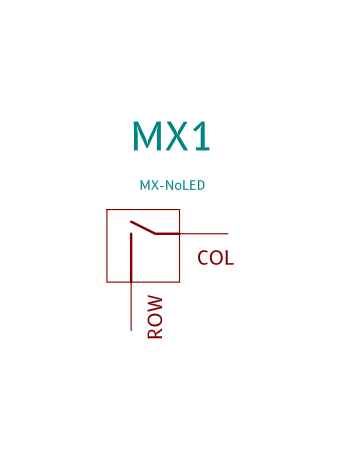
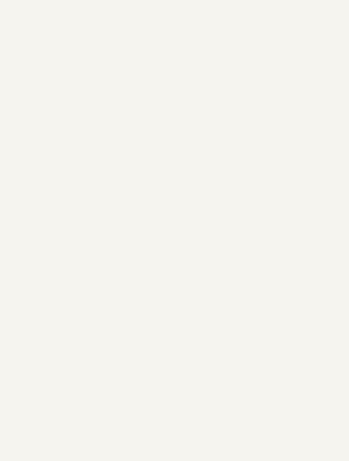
MX1: MX-NoLED (167, 270) -> none

